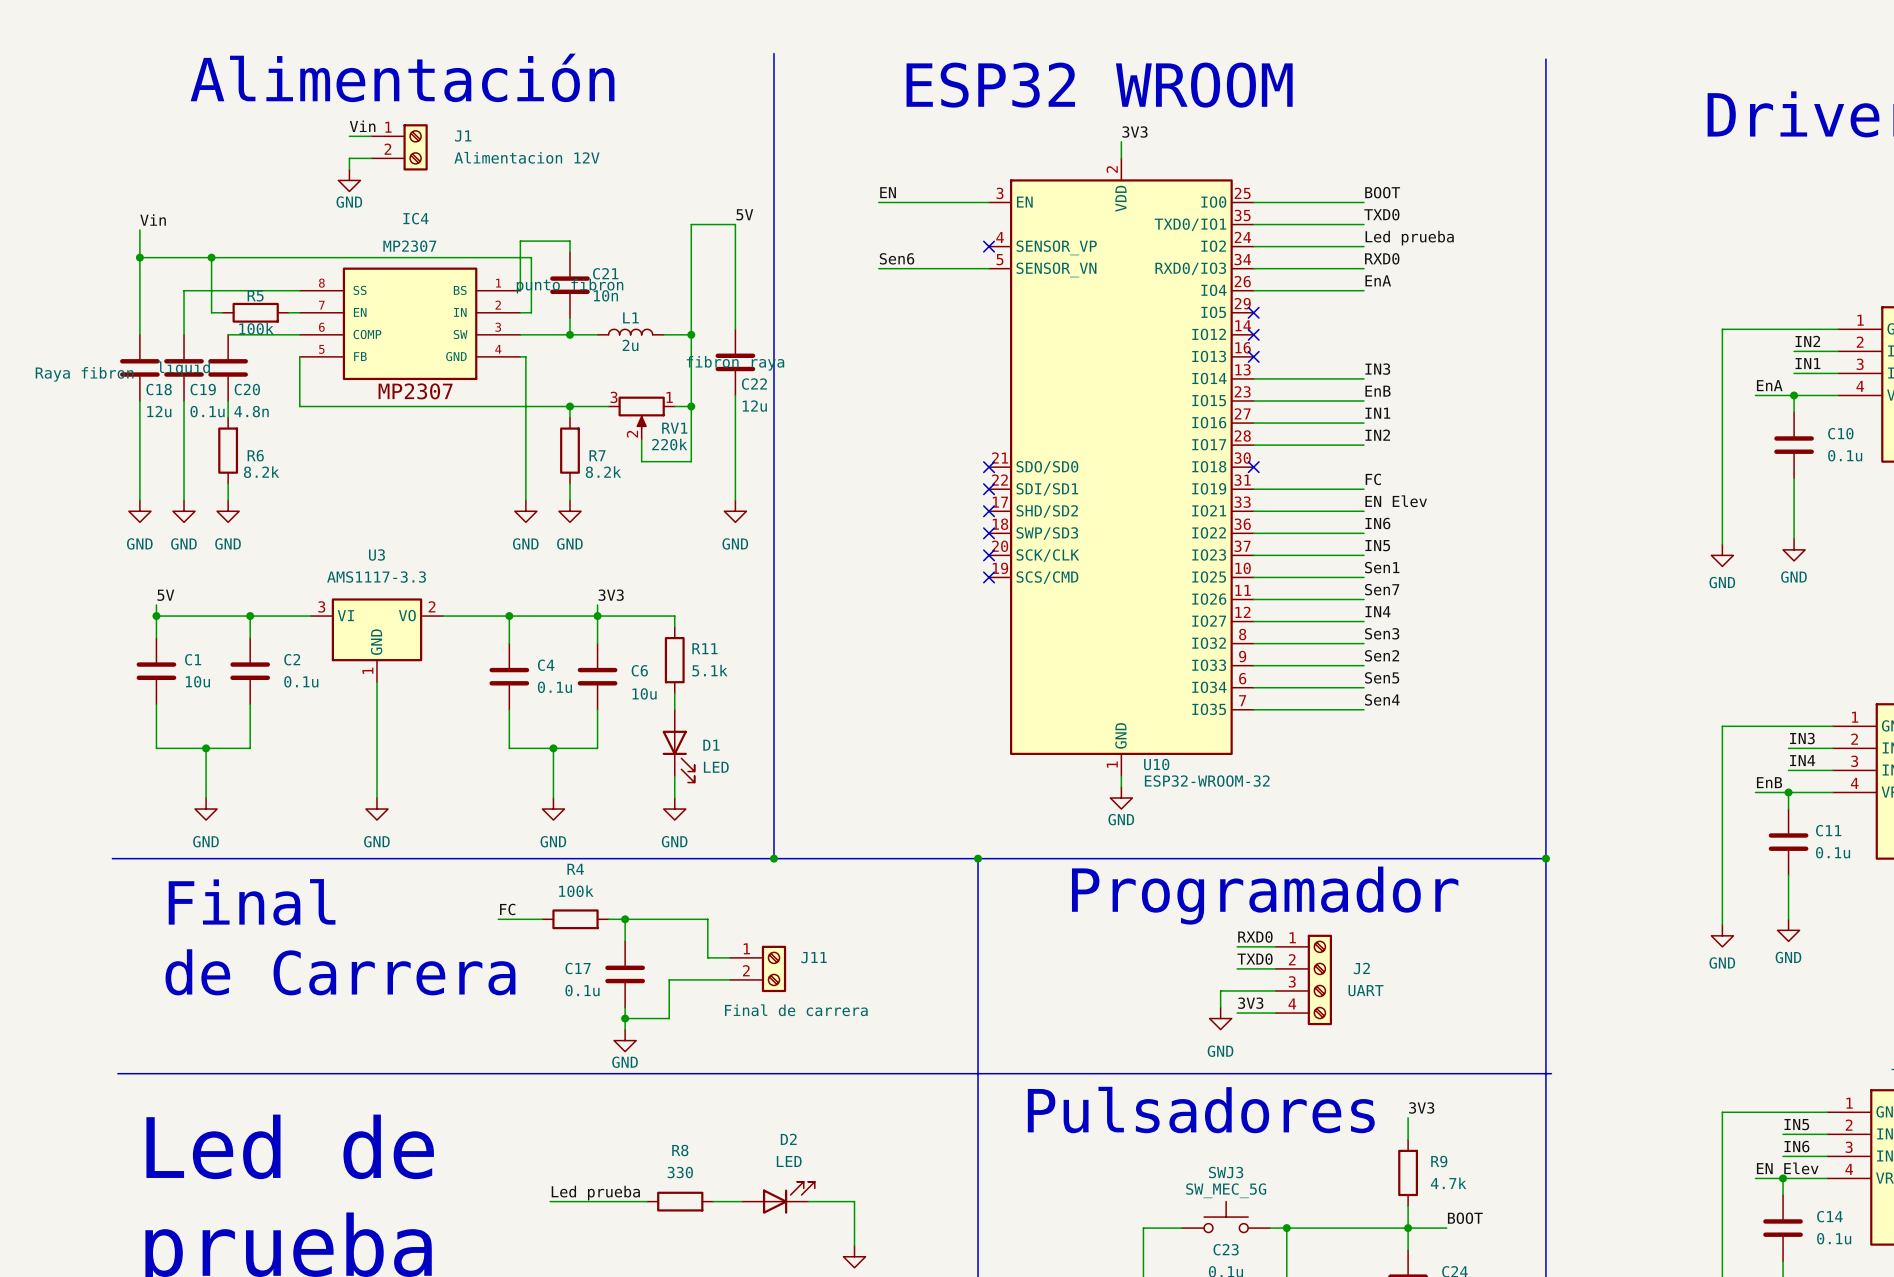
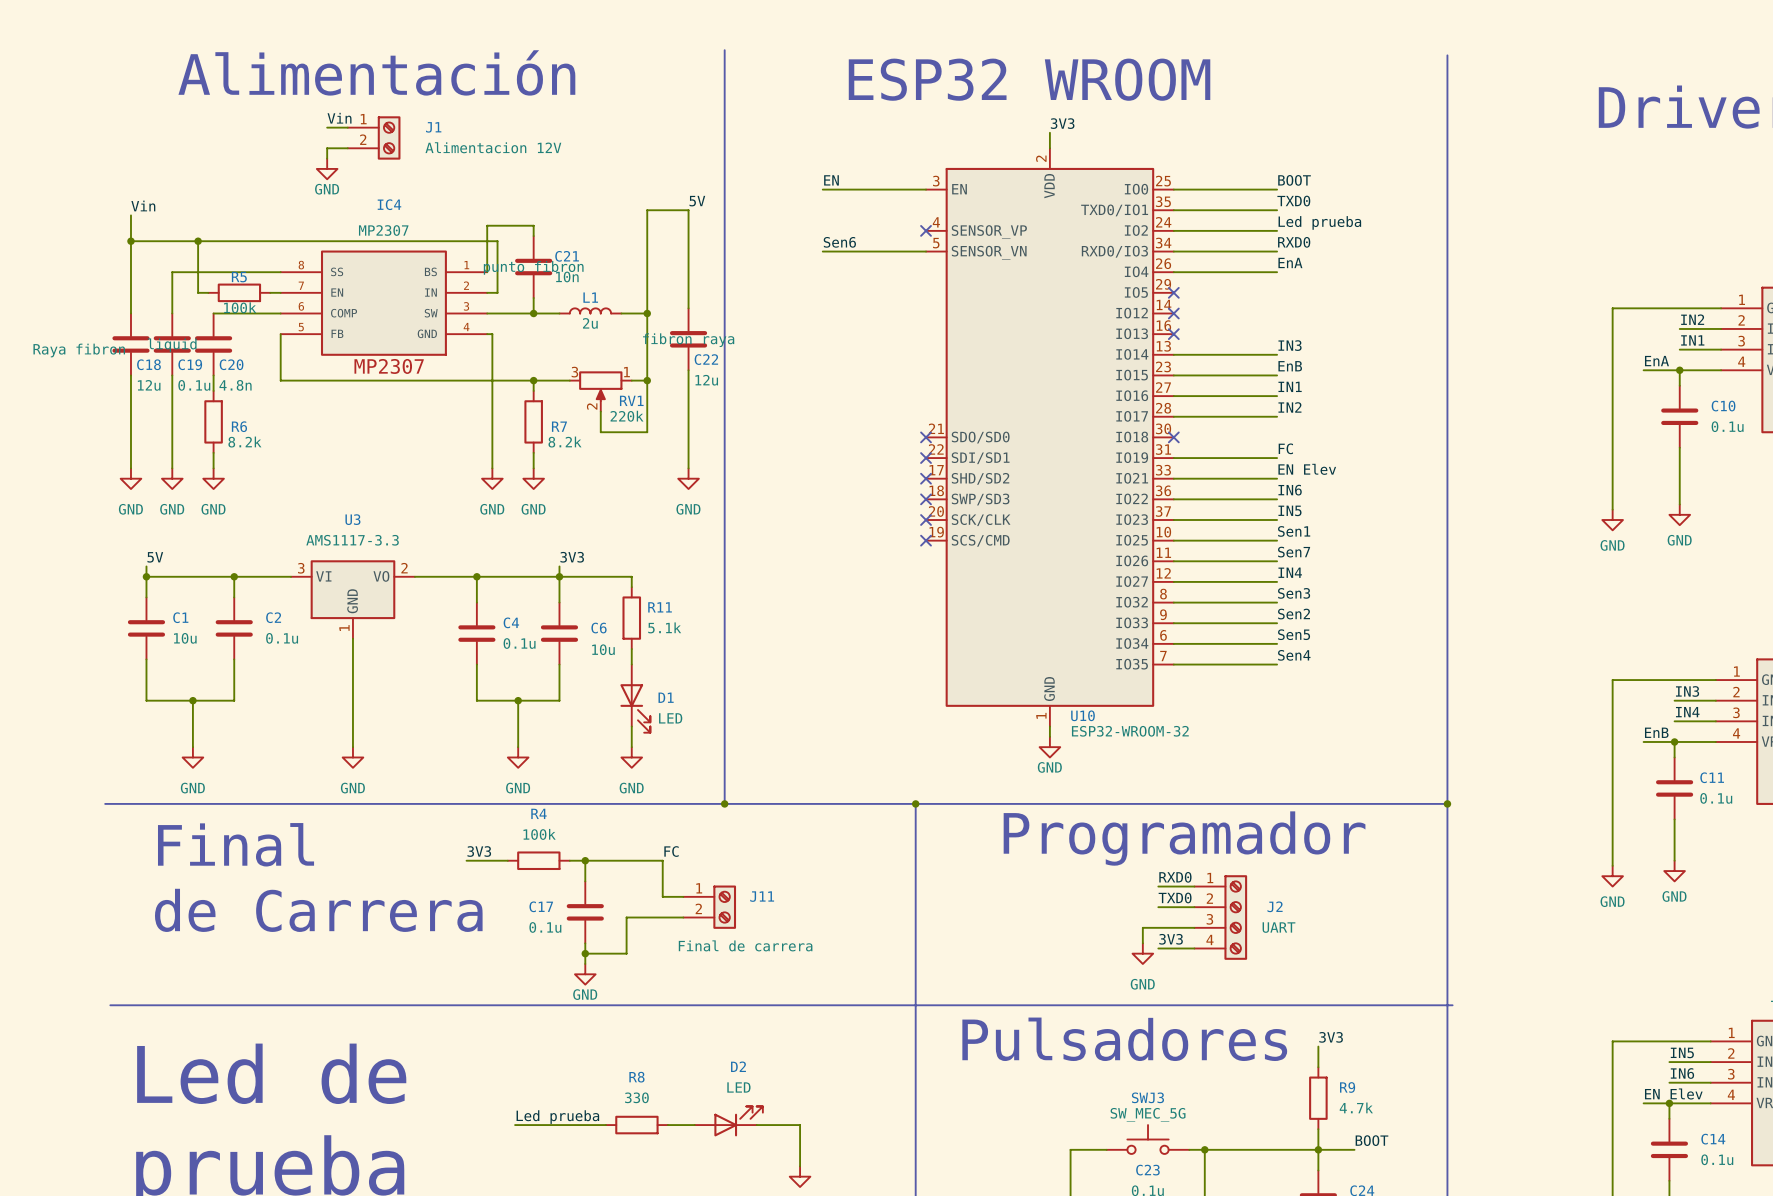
label: FC (507, 909) -> 3V3 (479, 851)
label: none -> FC (671, 851)

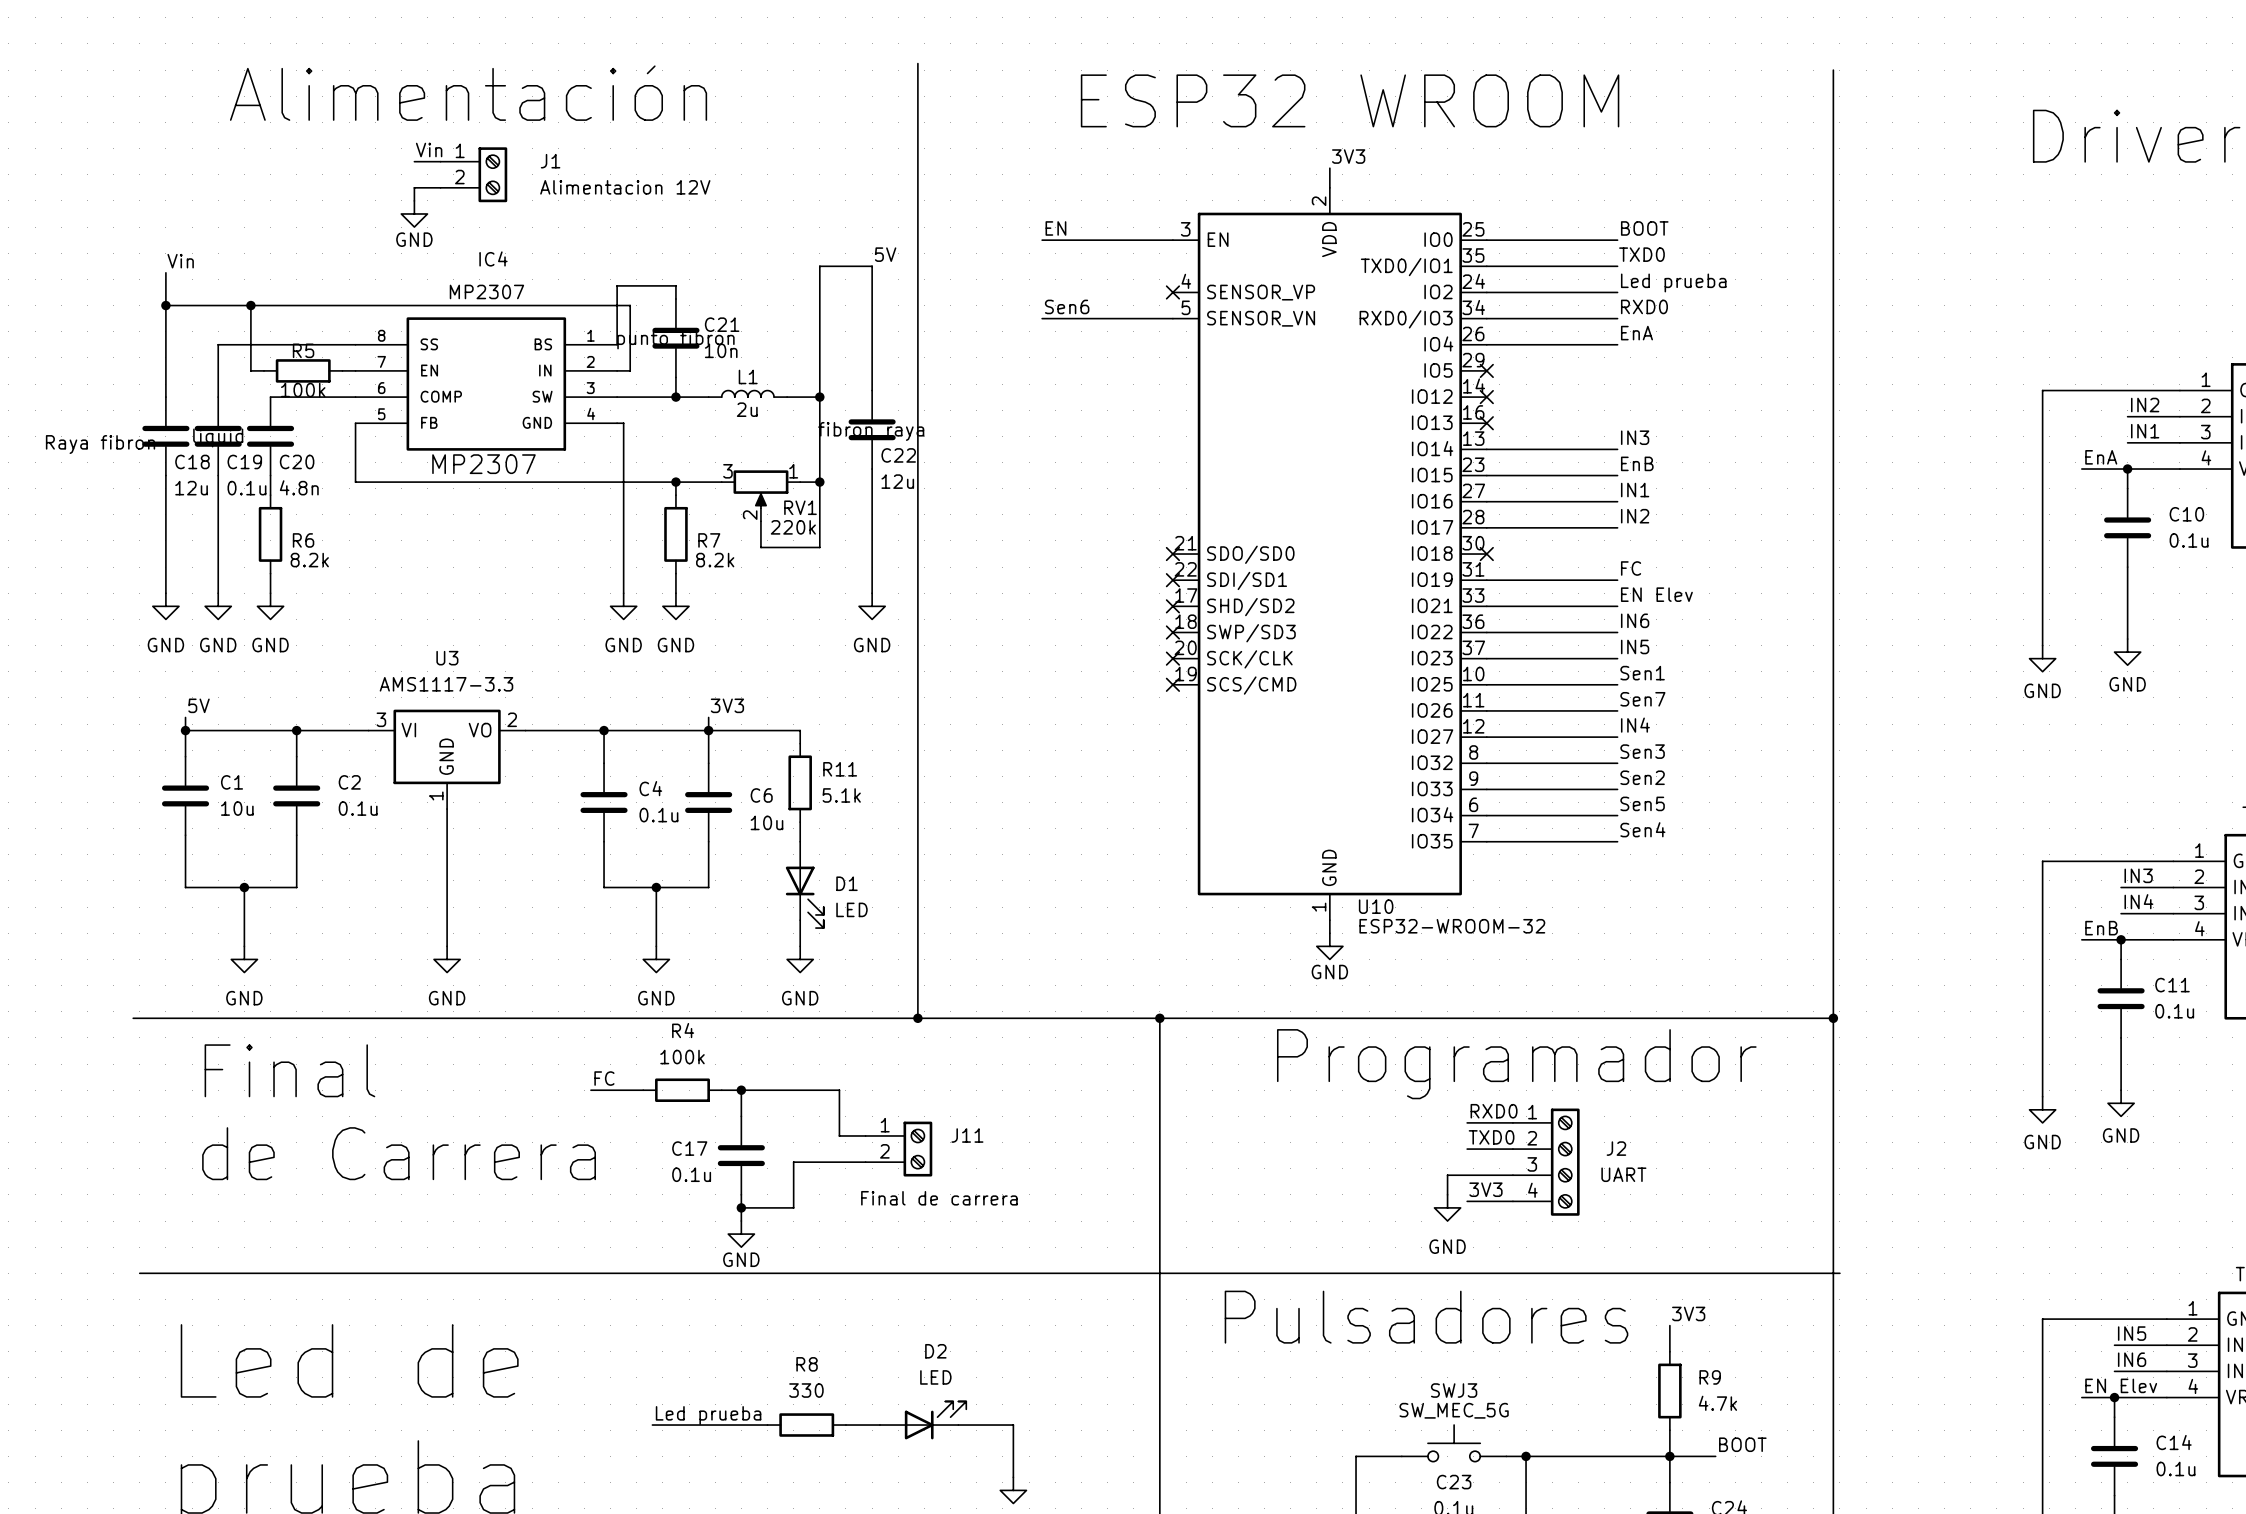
label: 3V3 (479, 851) -> FC (604, 1078)
label: FC (671, 851) -> none

